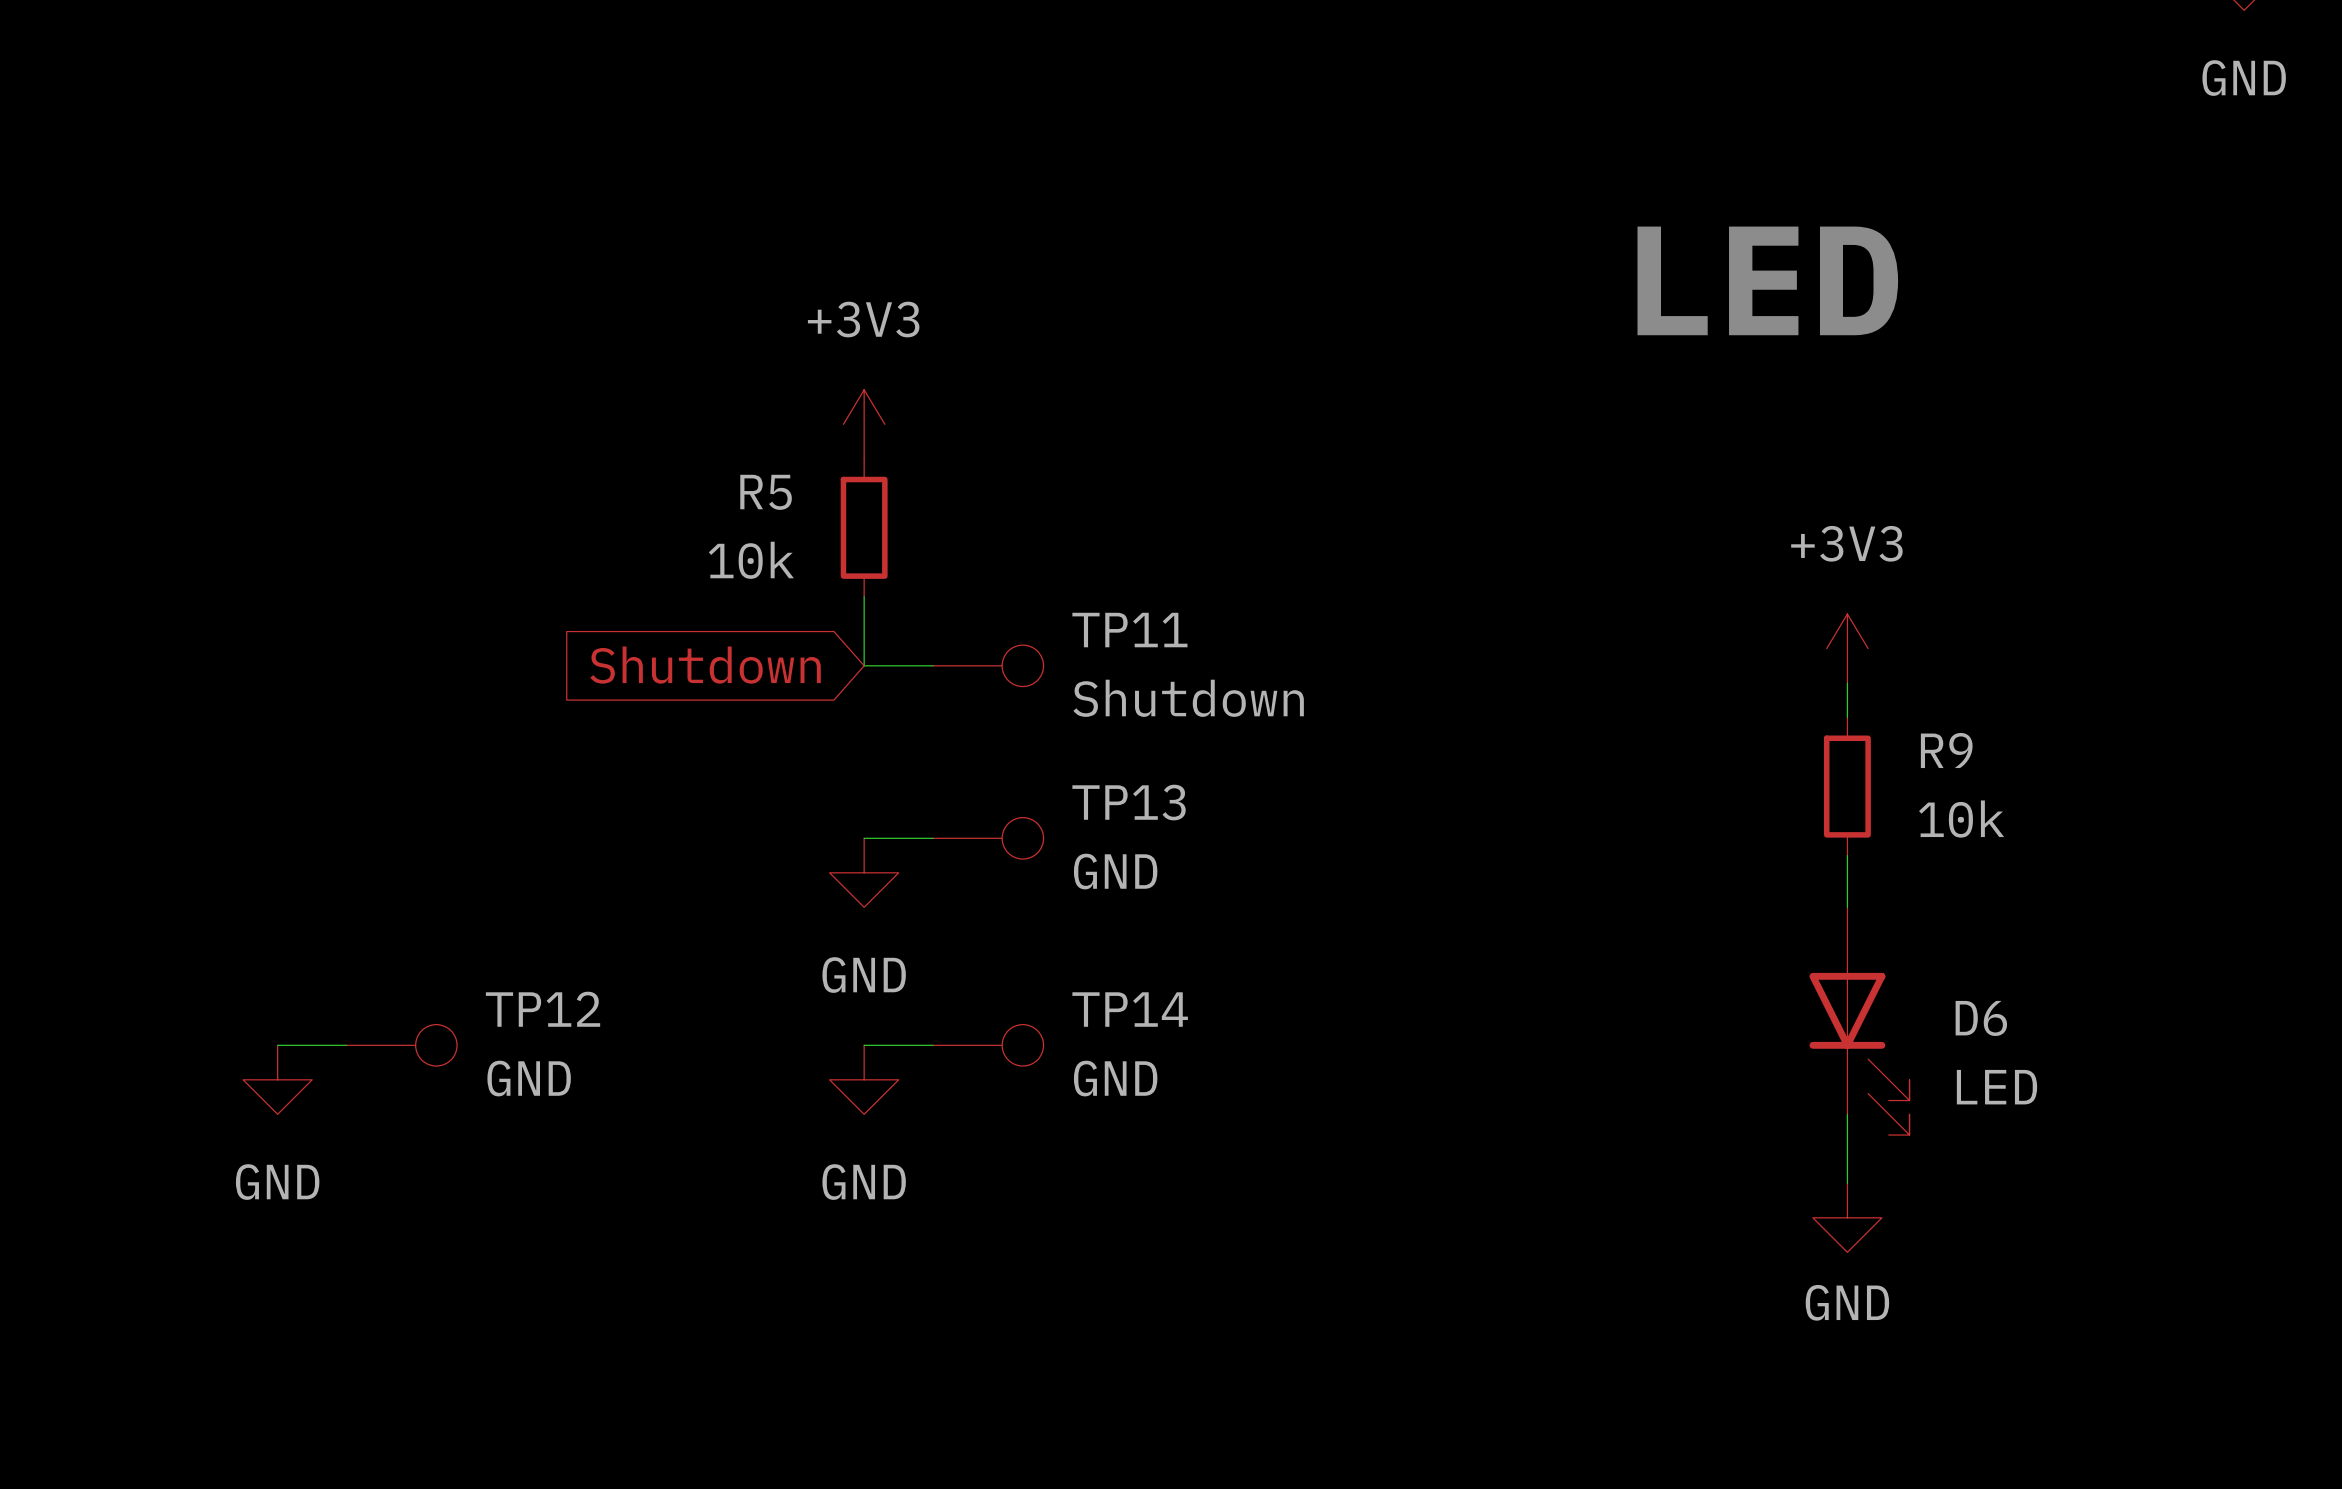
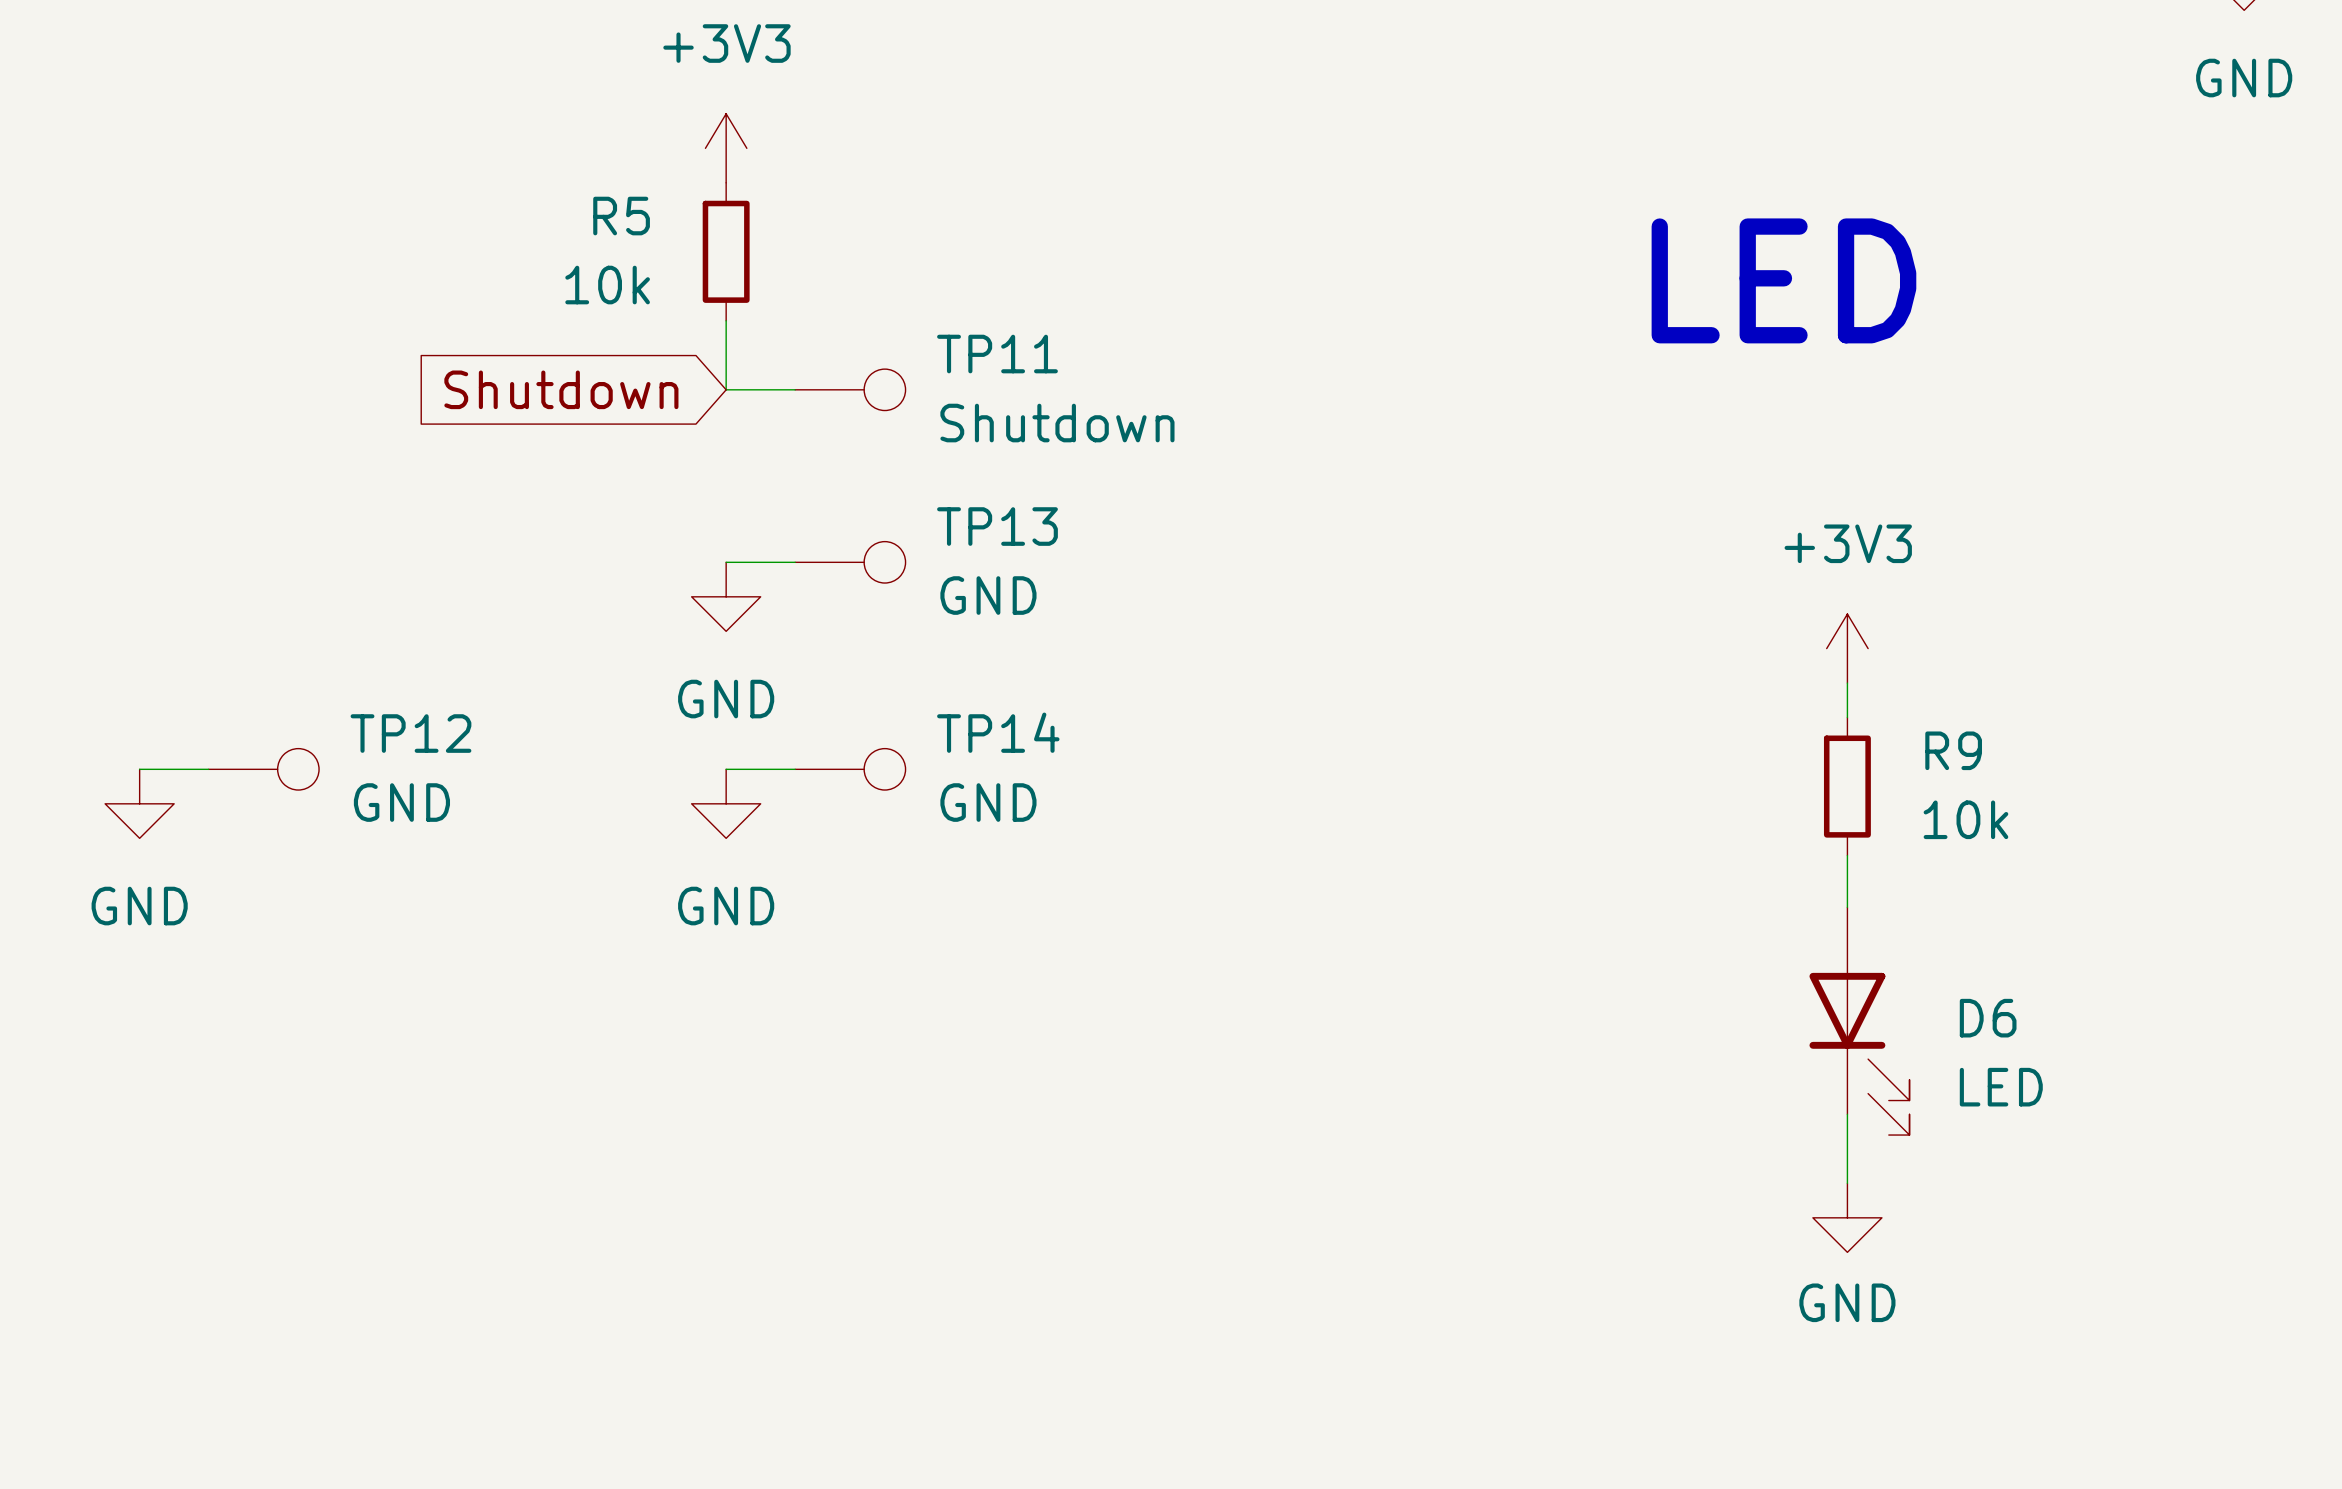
power symbol position: +3V3 (864, 424) -> +3V3 (726, 148)
R5 position: (864, 527) -> (726, 251)
power symbol: none -> GND (726, 596)
wire: (864, 596) (864, 665) (933, 665) -> (726, 320) (726, 389) (795, 389)
global label position: Shutdown (705, 665) -> Shutdown (561, 389)
TP11 position: (988, 665) -> (850, 389)
power symbol: none -> GND (139, 803)
power symbol: none -> GND (726, 803)
wire: (864, 838) (933, 838) -> (726, 562) (795, 562)
TP13 position: (988, 838) -> (850, 562)
power symbol: GND (864, 872) -> none
wire: (277, 1045) (346, 1045) -> (139, 769) (208, 769)
TP12 position: (401, 1045) -> (263, 769)
wire: (864, 1045) (933, 1045) -> (726, 769) (795, 769)
TP14 position: (988, 1045) -> (850, 769)
power symbol: GND (277, 1079) -> none
power symbol: GND (864, 1079) -> none

